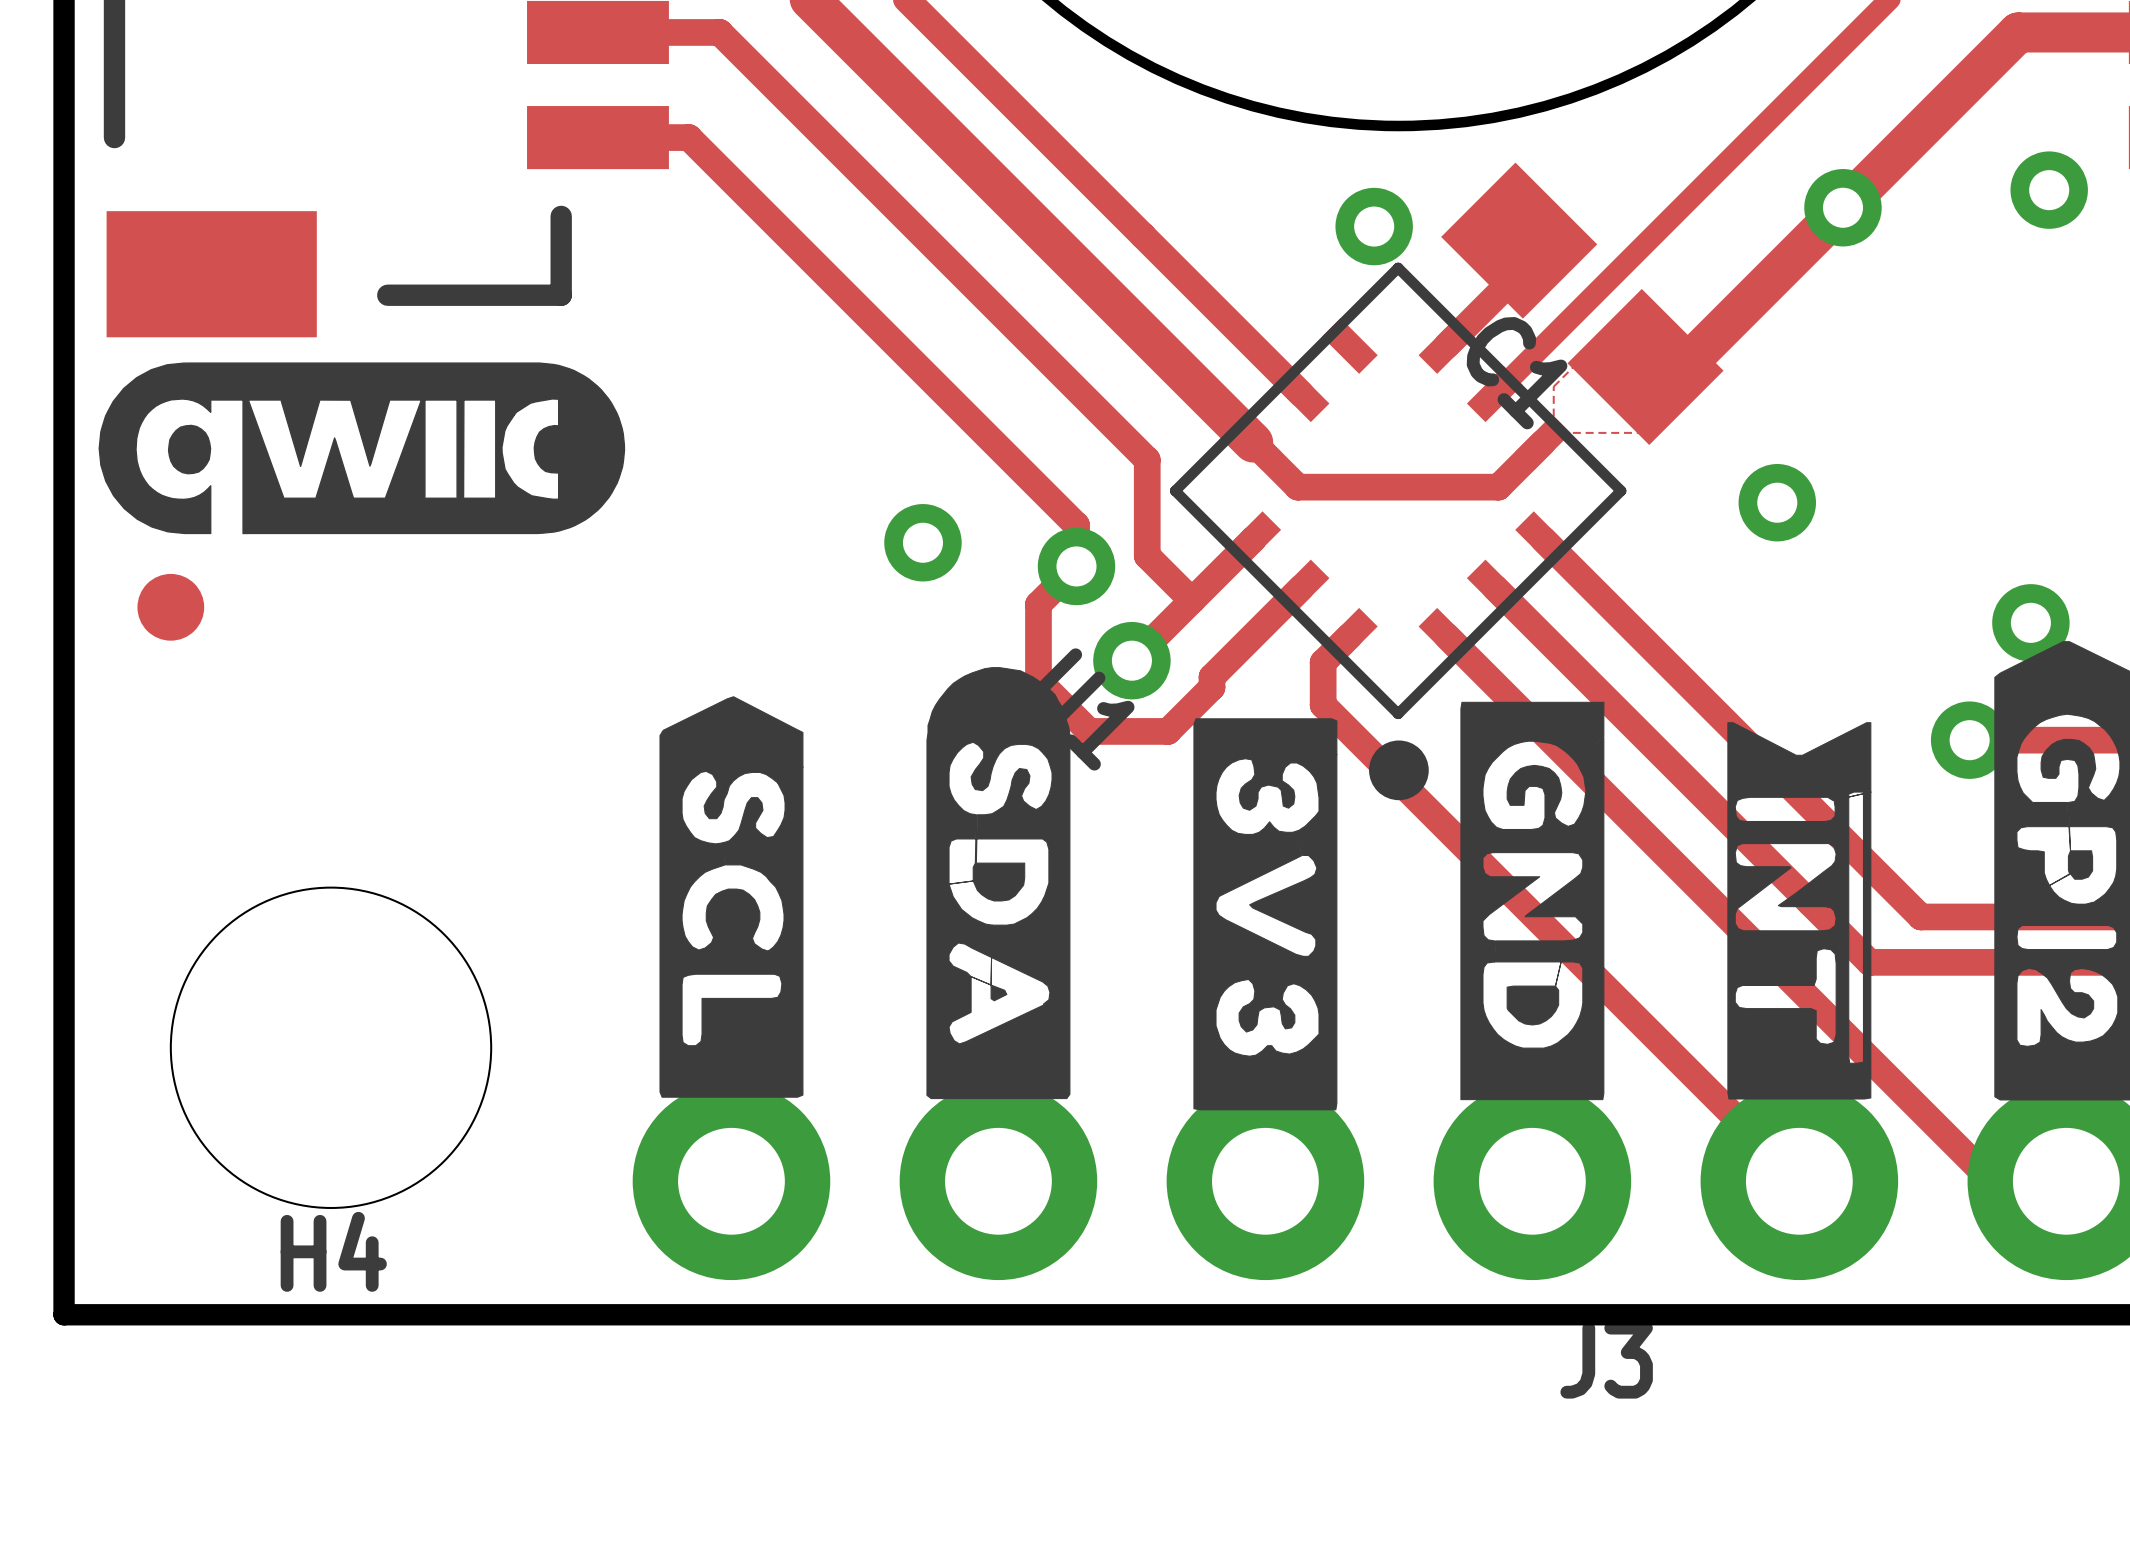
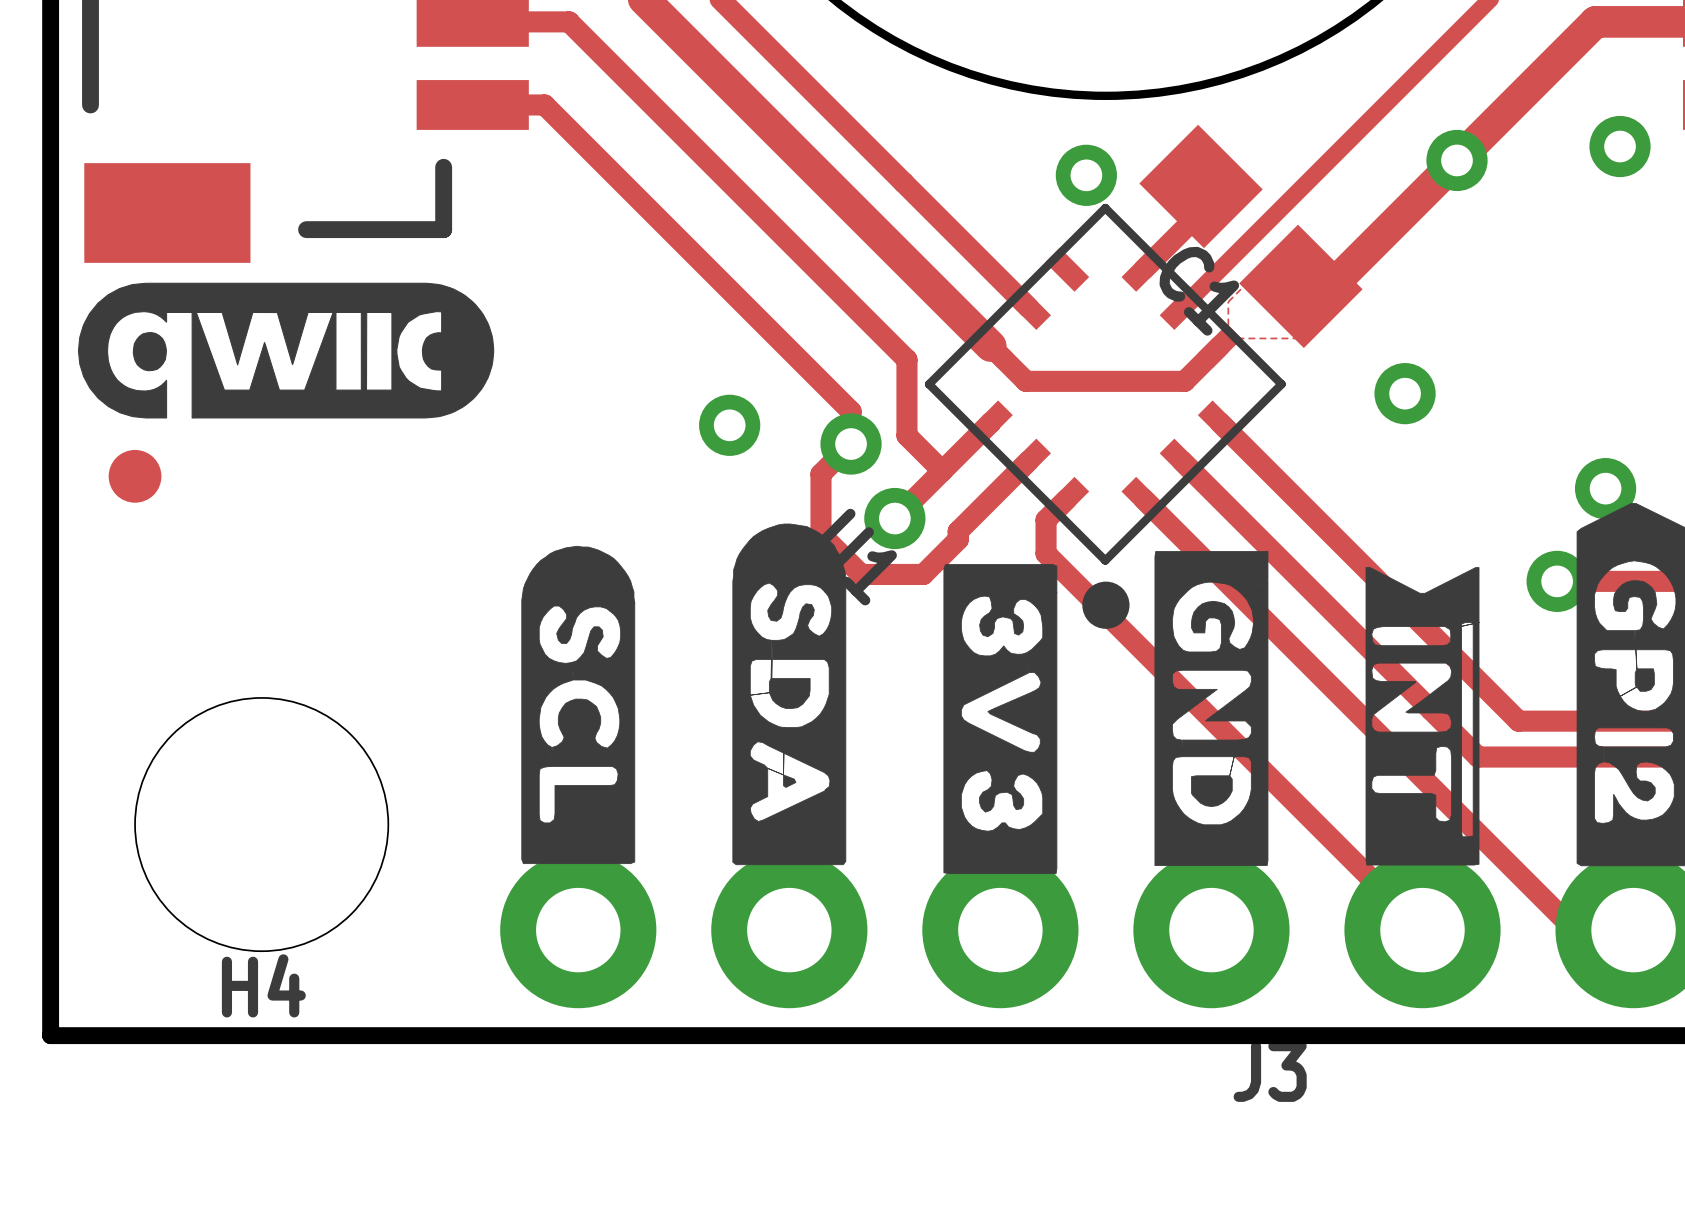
drawing shape: [659, 696, 804, 1098] -> [521, 545, 636, 865]

